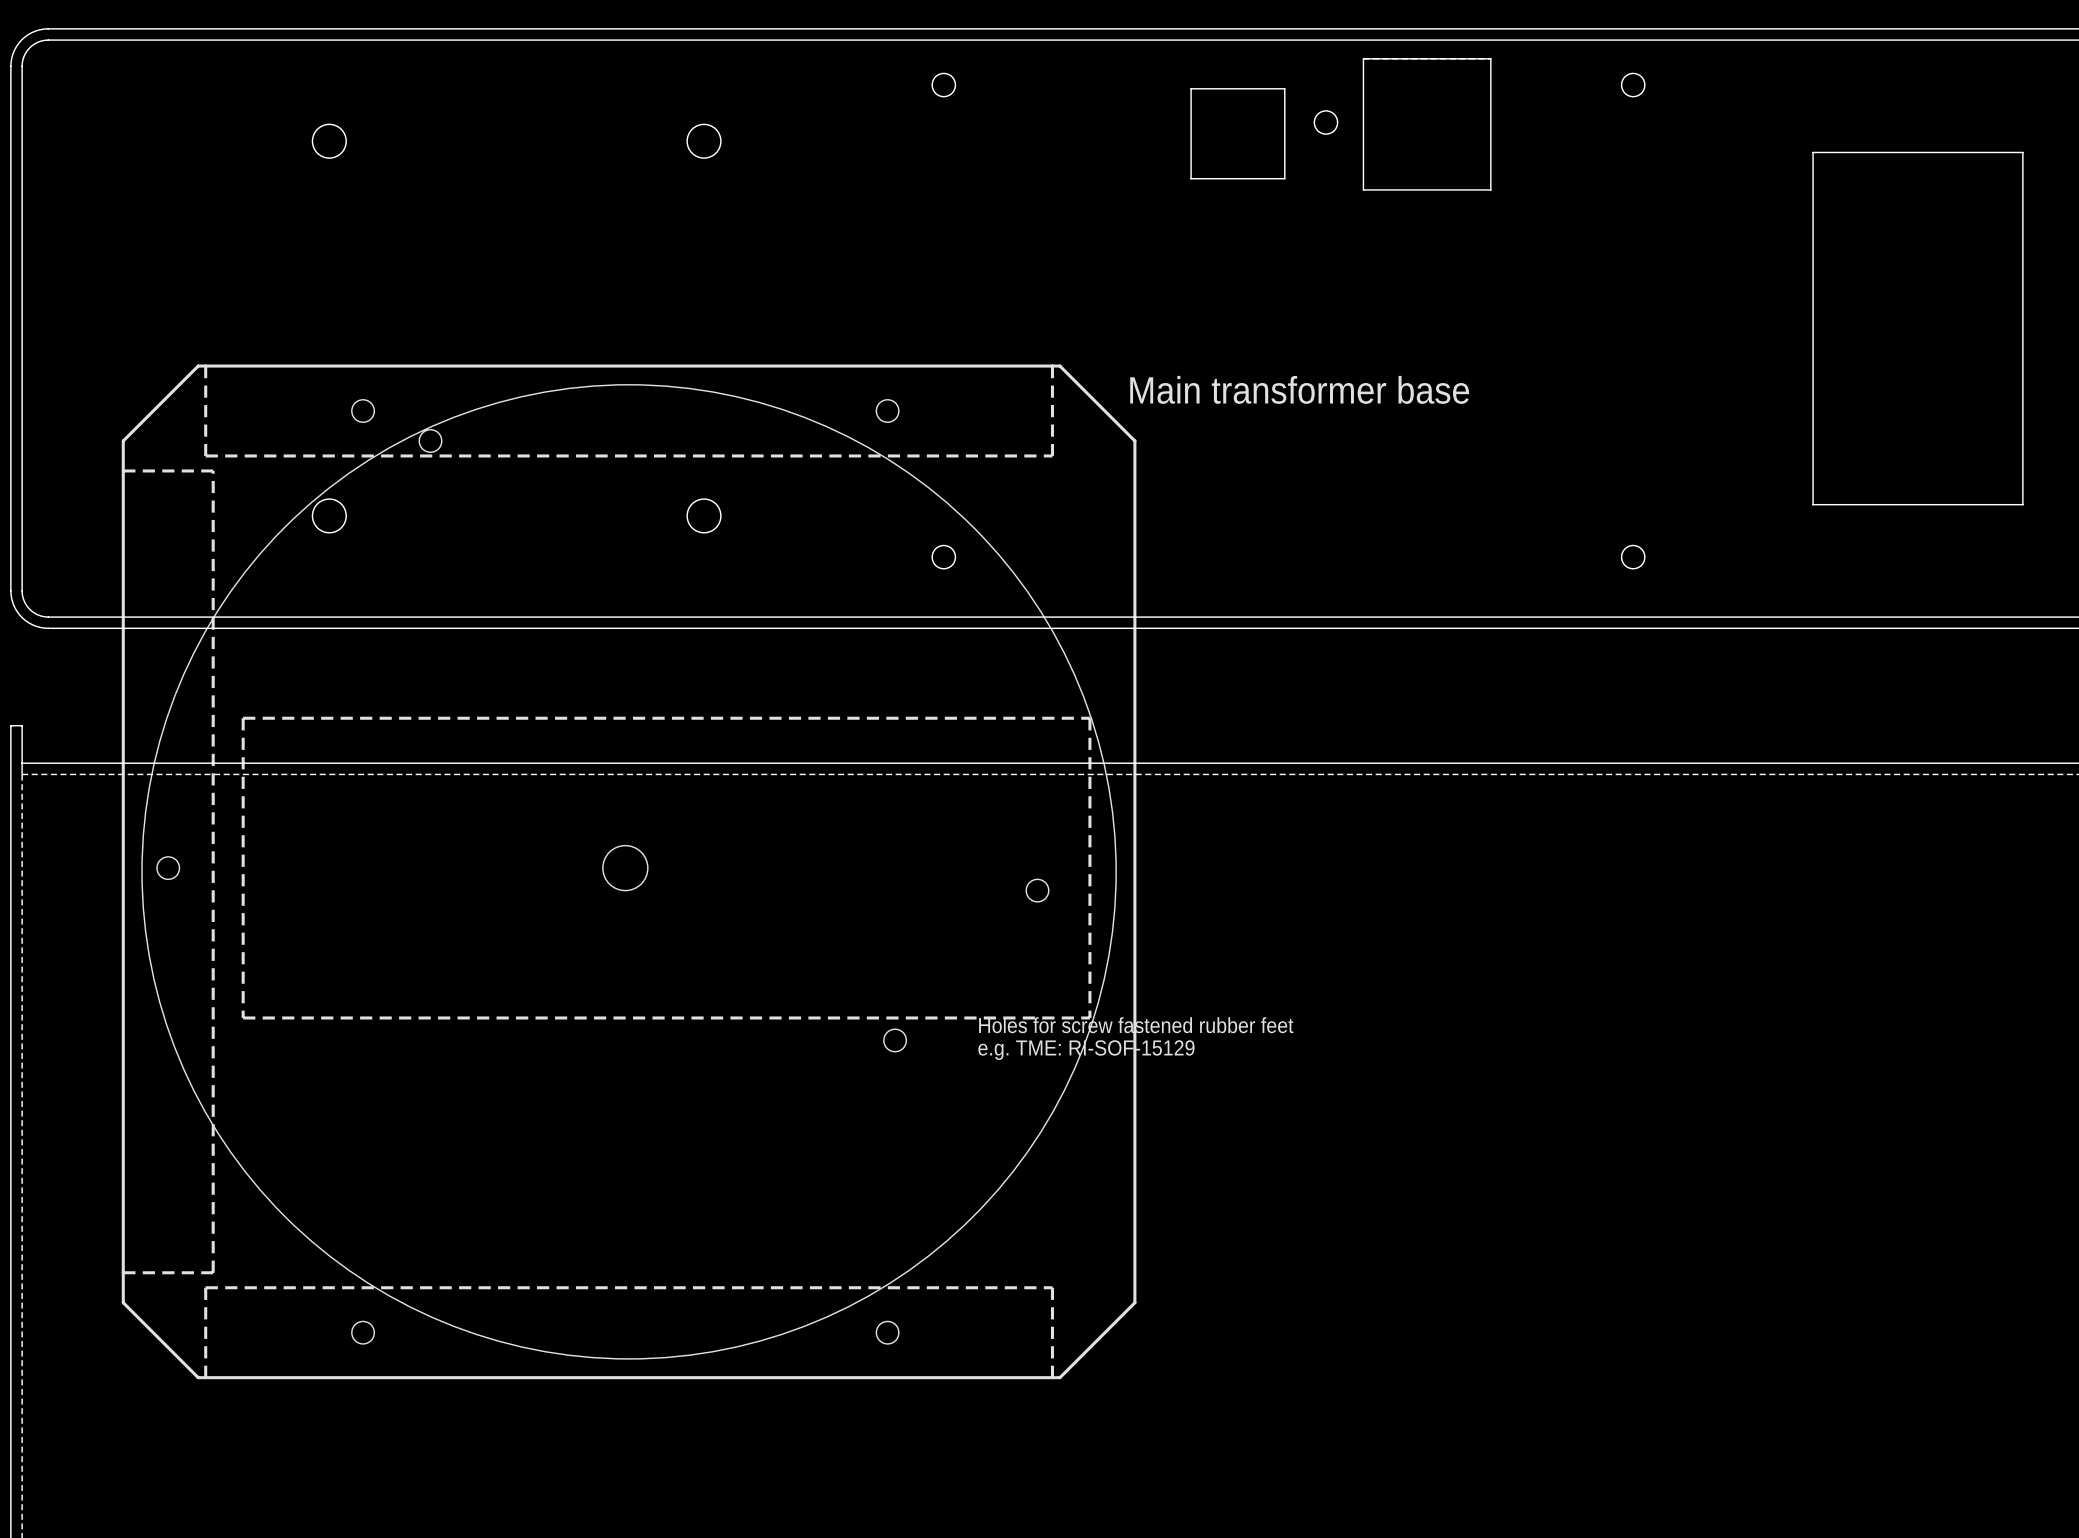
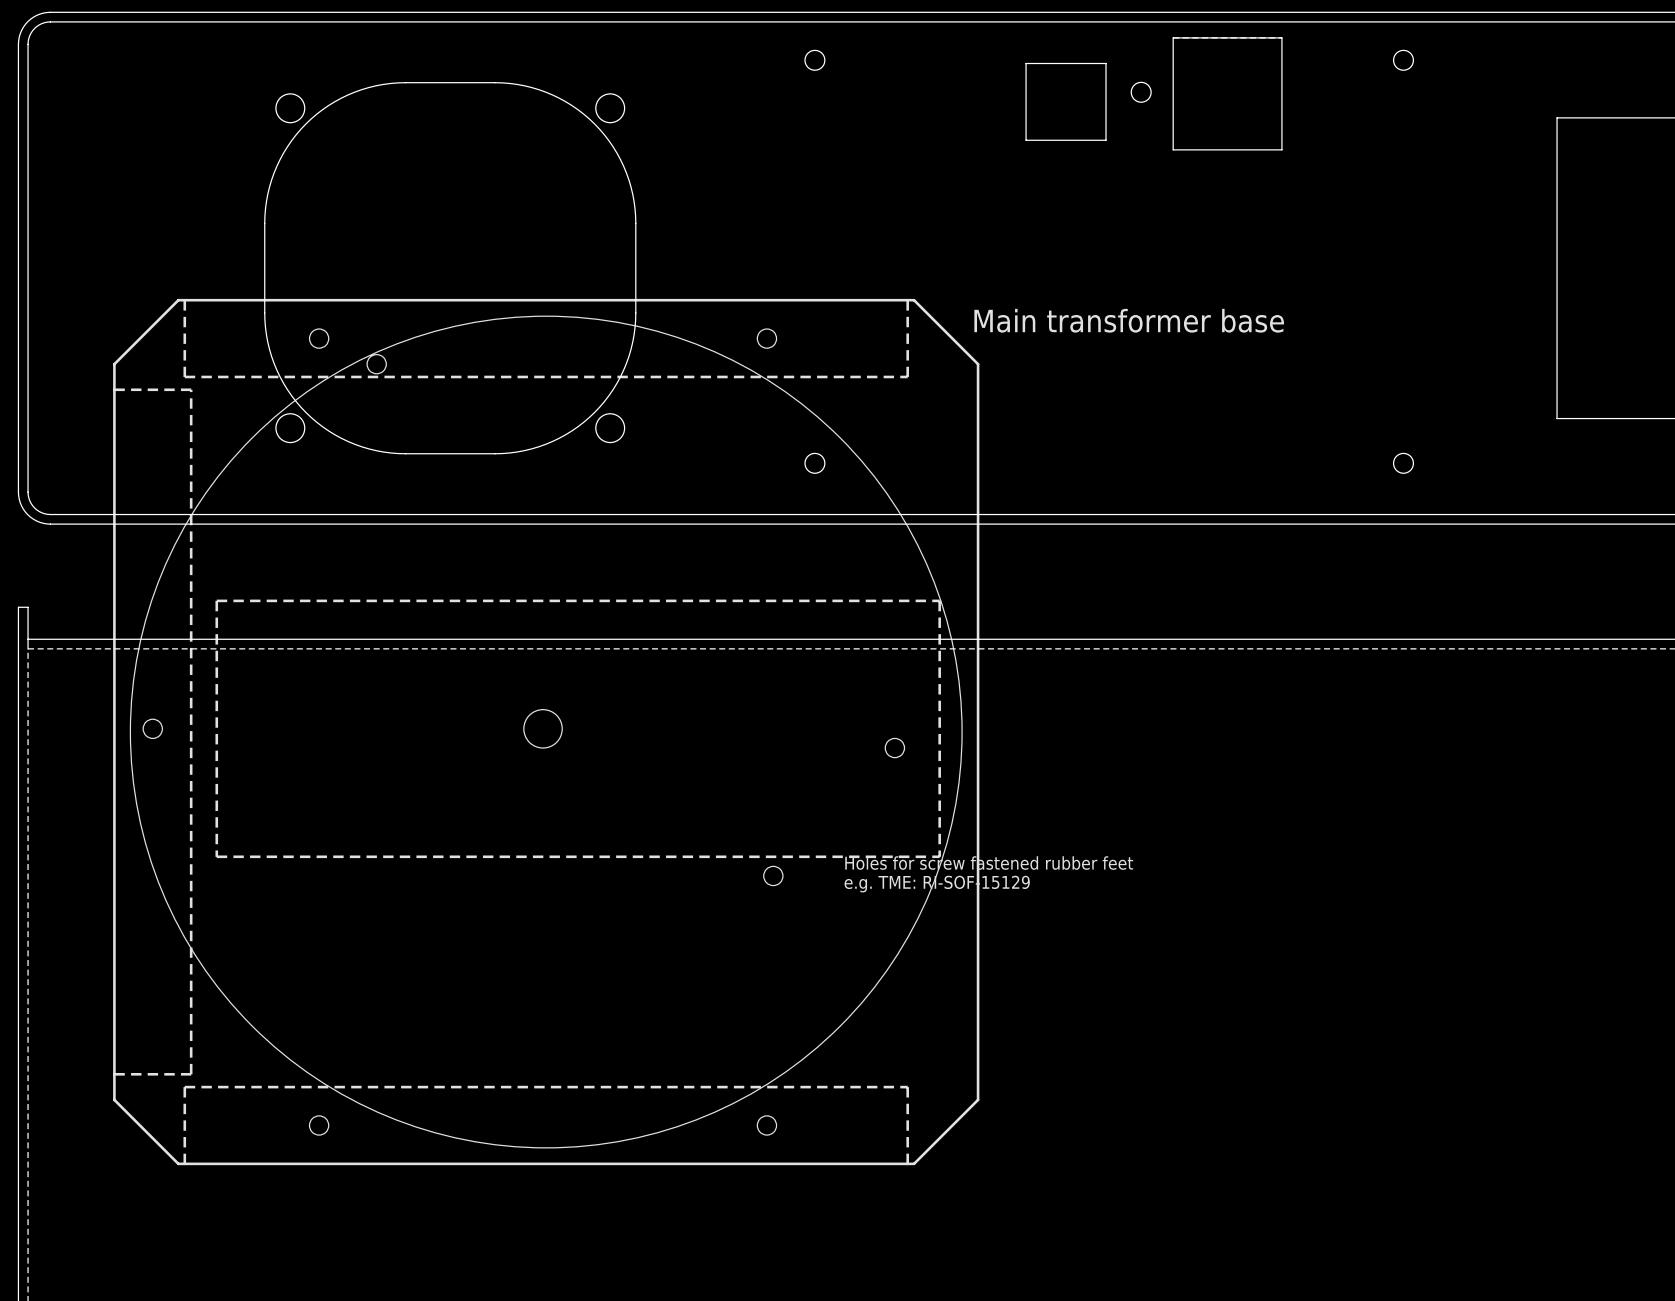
board edge: none -> (405, 82) (502, 82) (524, 85) (545, 92) (571, 105) (594, 123) (613, 146) (626, 173) (634, 201) (635, 223) (635, 320) (628, 356) (616, 383) (599, 407) (571, 431) (545, 444) (517, 452) (495, 453) (398, 453) (361, 446) (335, 434) (311, 417) (287, 389) (274, 363) (267, 342) (264, 320) (264, 223) (267, 194) (276, 166) (287, 146) (300, 129) (328, 105) (348, 94) (369, 87) (405, 82)

